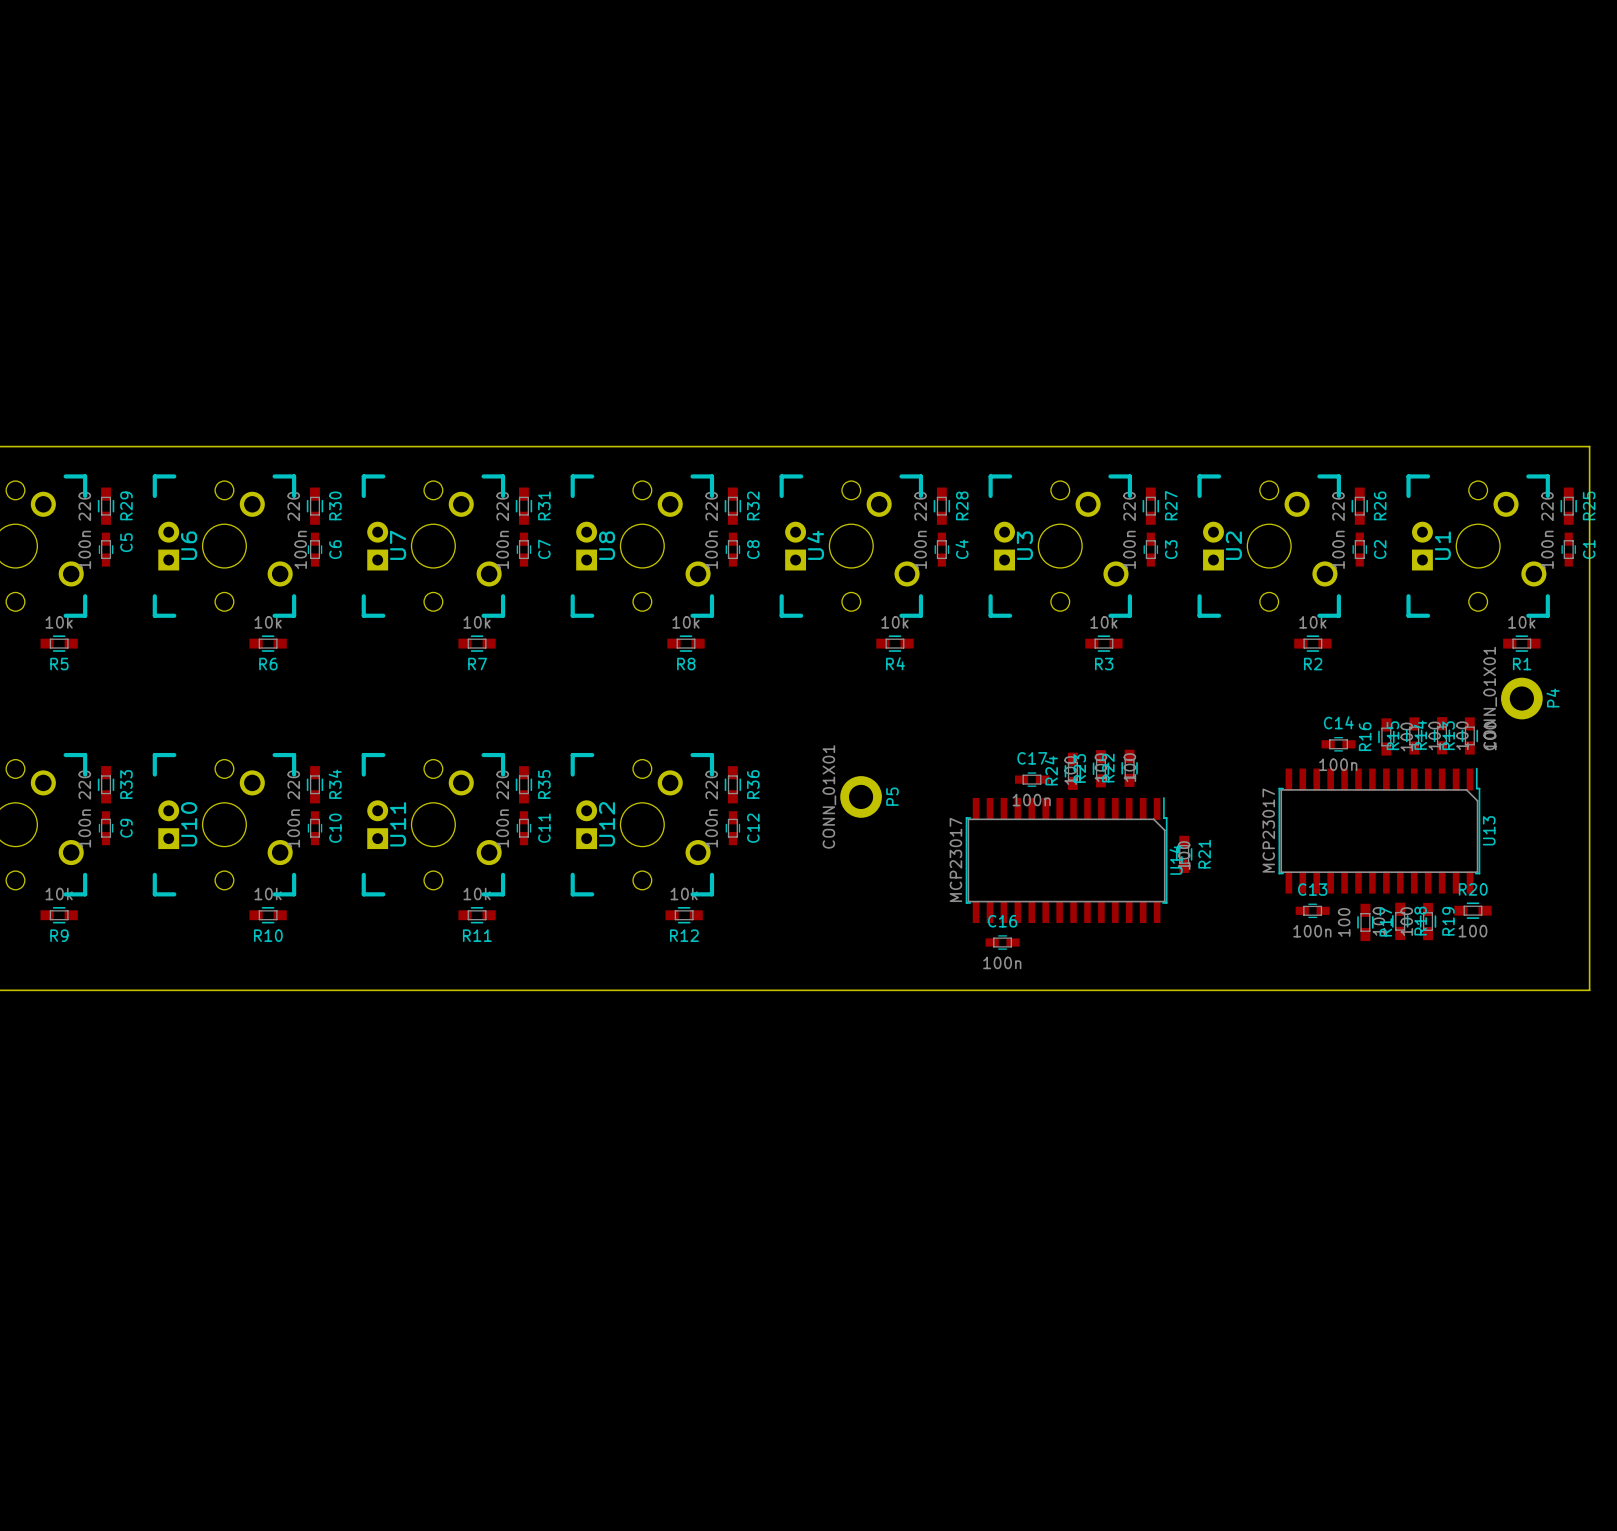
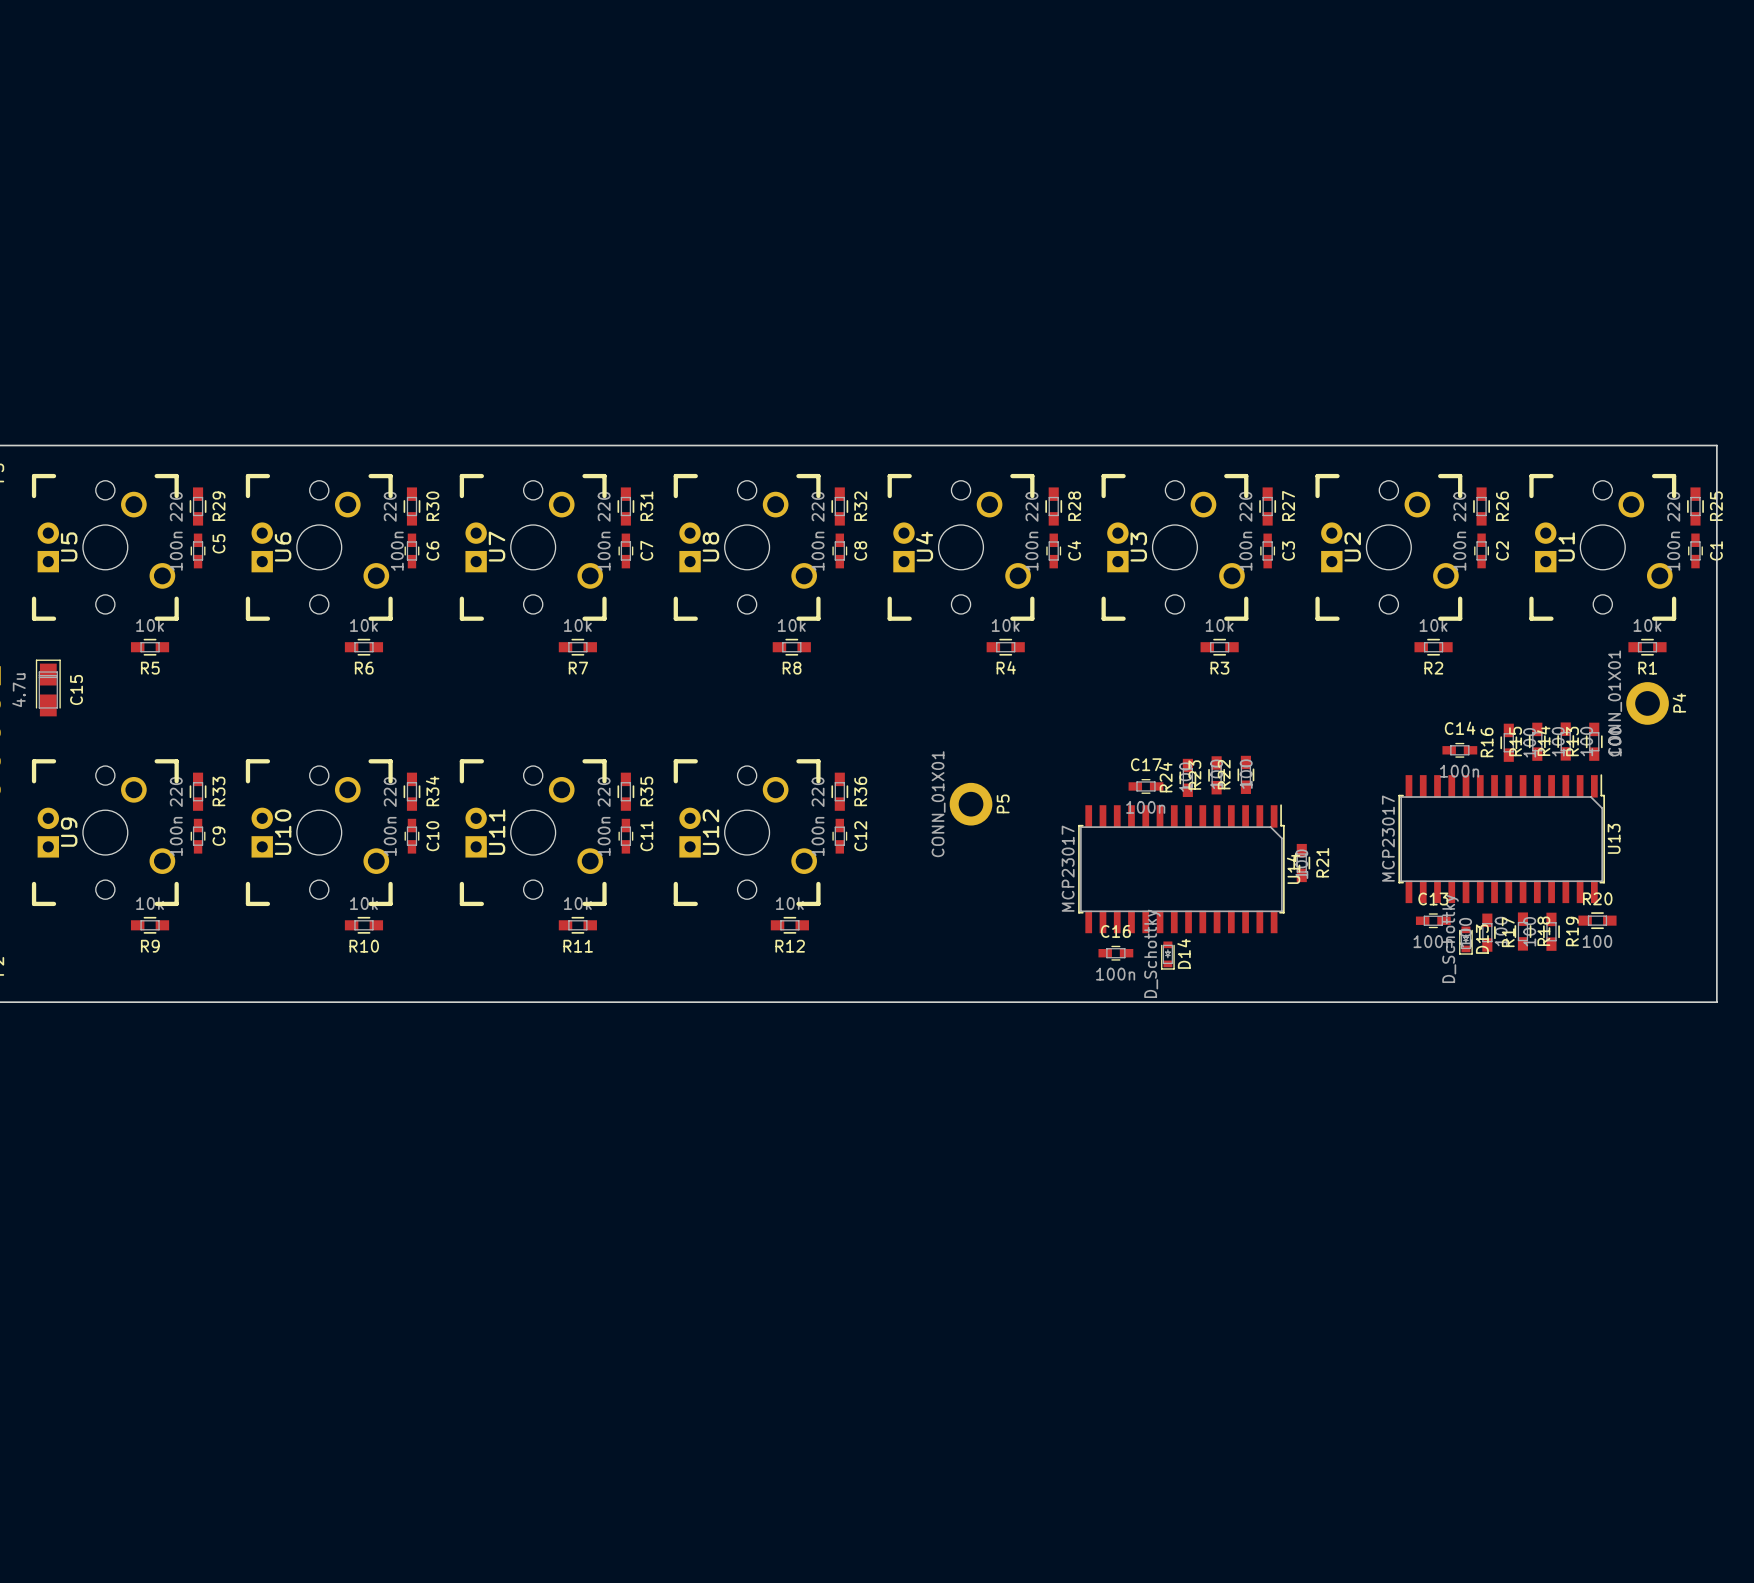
D13: none -> D_Schottky (1465, 940)
D14: none -> D_Schottky (1167, 955)

